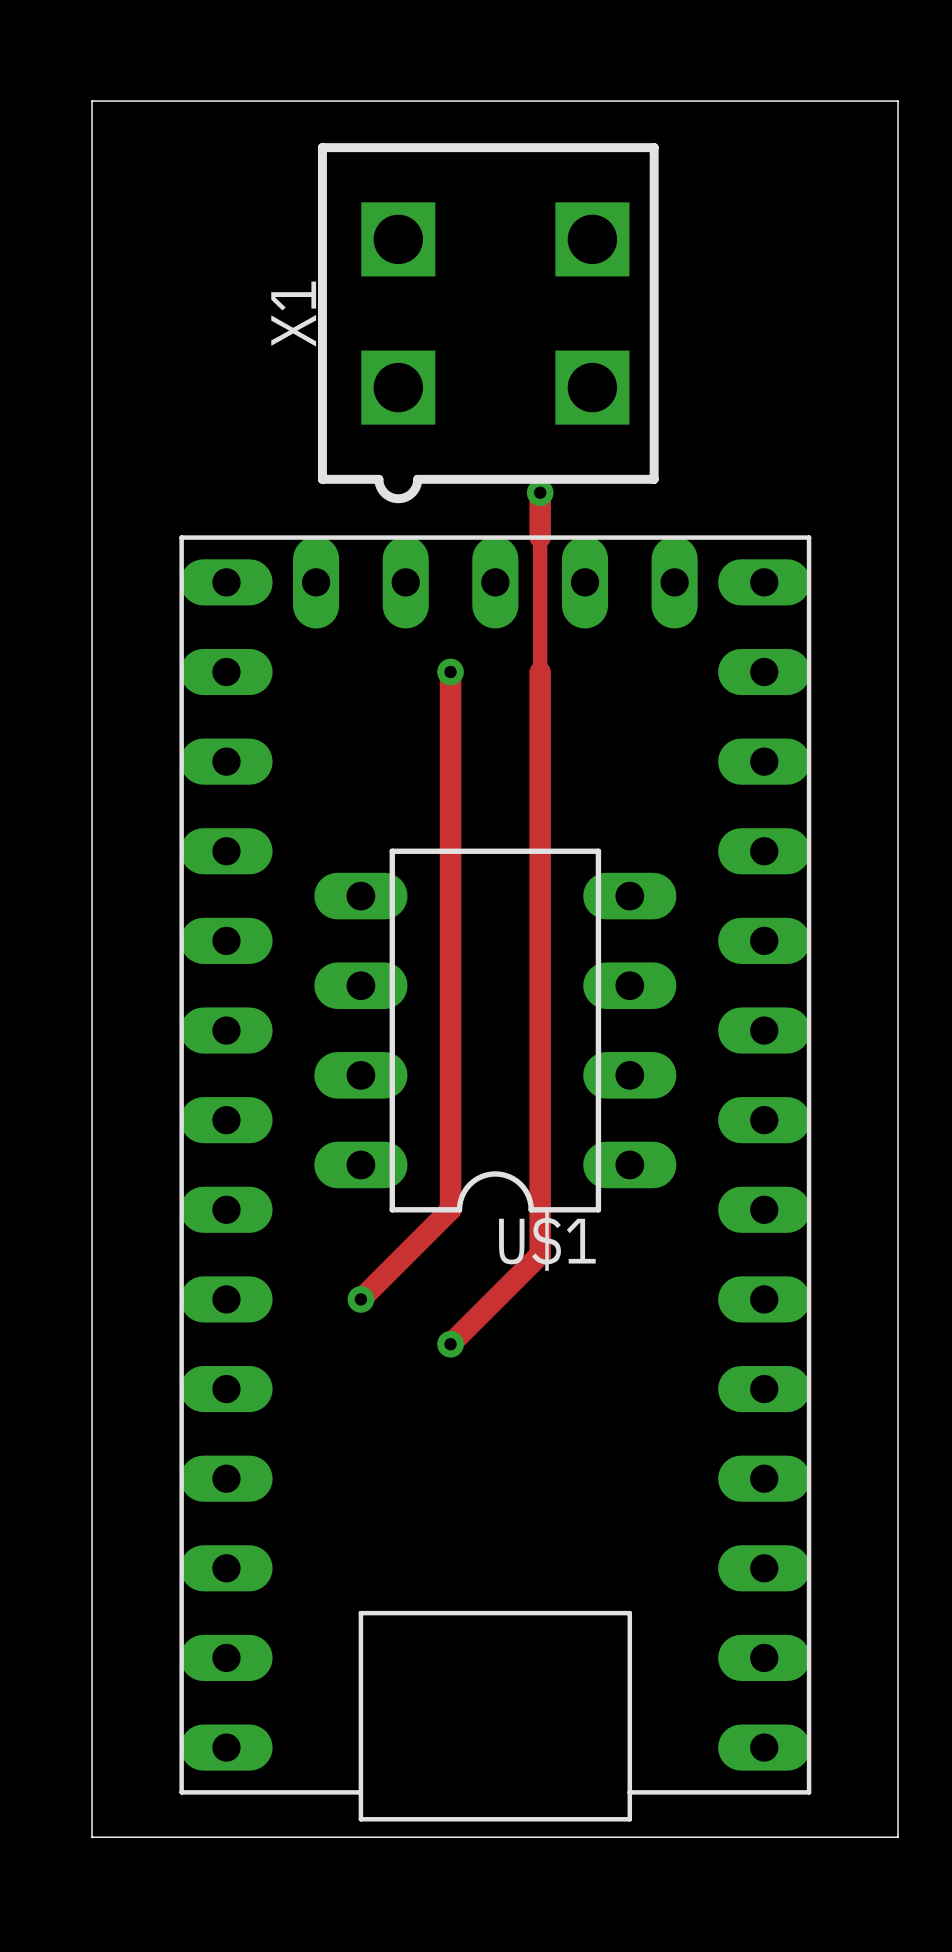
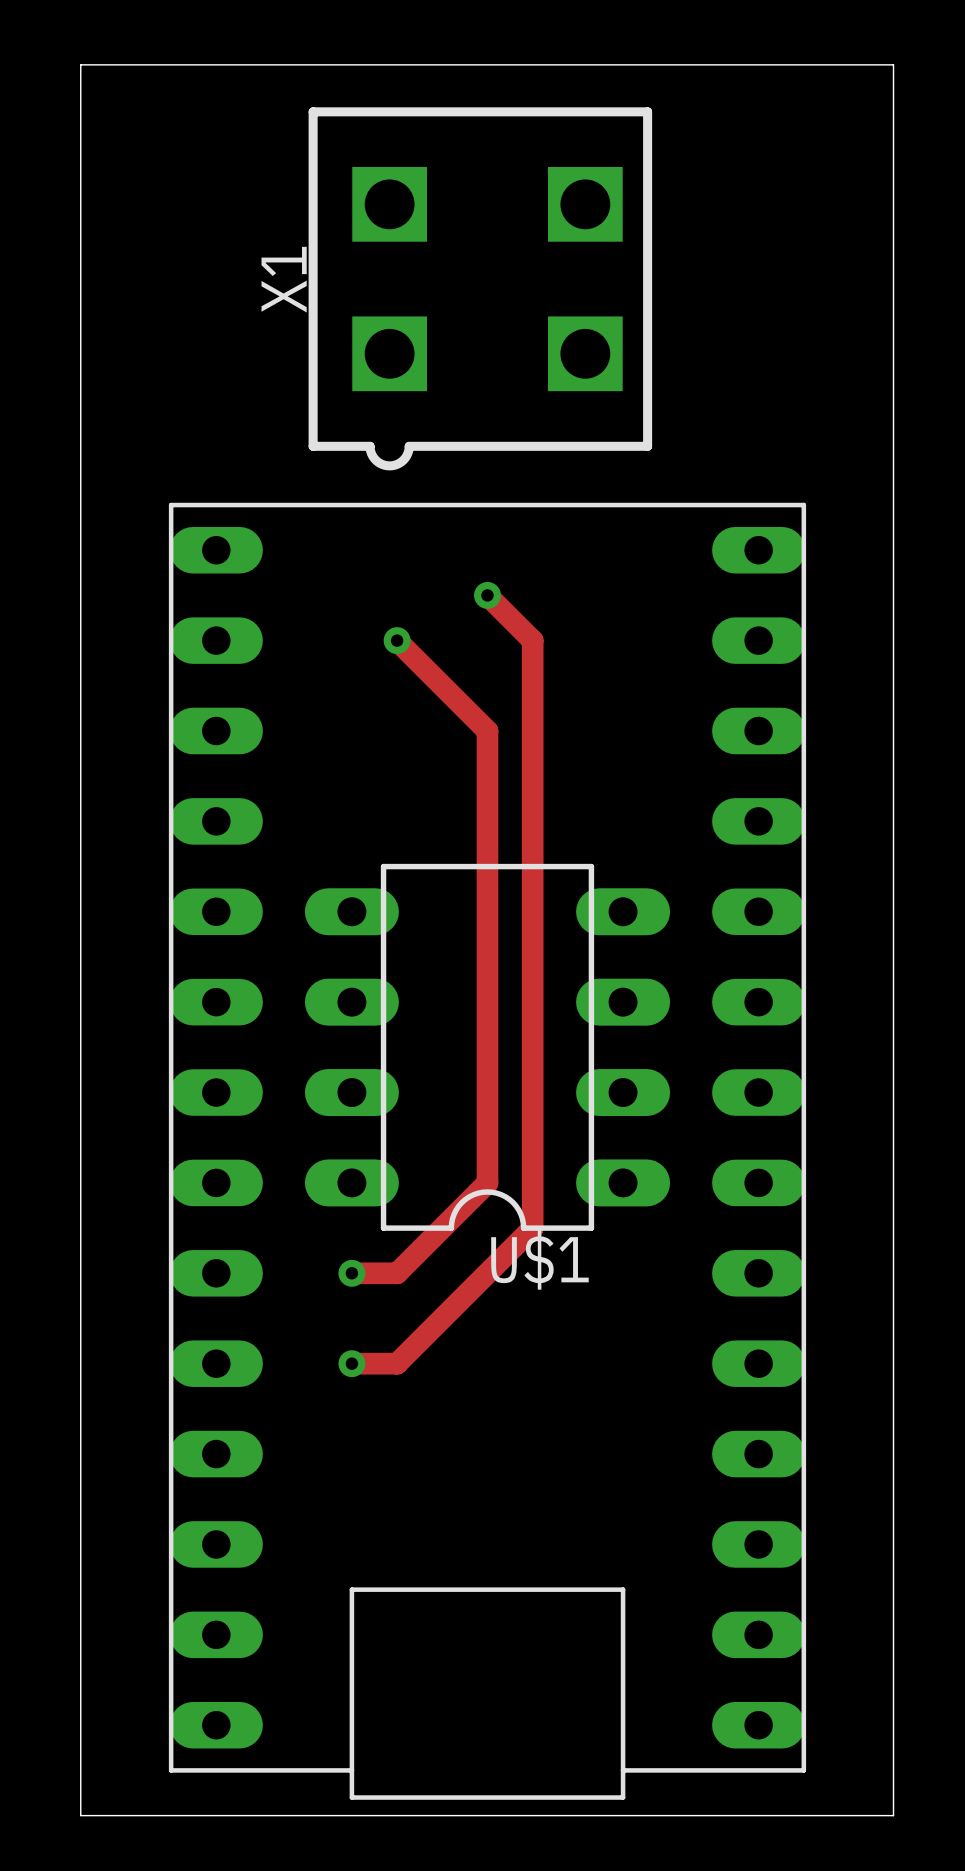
track: (540, 492) (540, 672) -> (487, 595) (532, 640)
via: (540, 492) -> none
part footprint: [179, 535, 812, 1822] -> [168, 502, 807, 1800]
via: none -> (487, 595)
via: none -> (397, 640)
track: (450, 672) (450, 1209) (360, 1299) -> (397, 640) (487, 731) (487, 1182) (397, 1273) (351, 1273)
via: (450, 672) -> none
U$1 position: (495, 1030) -> (487, 1047)
track: none -> (442, 1318) (397, 1363) (351, 1363)
via position: (450, 1344) -> (351, 1363)

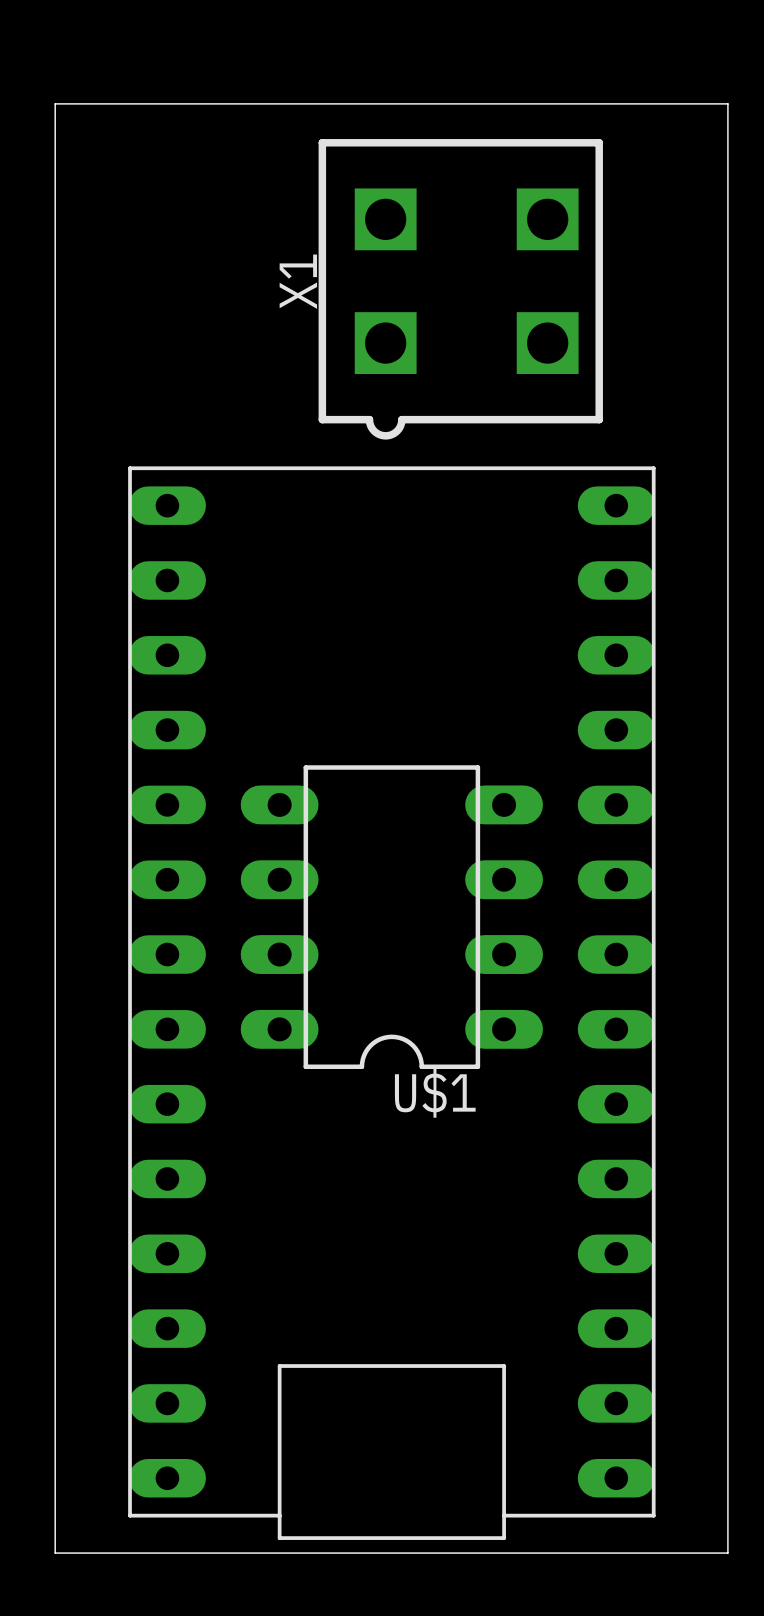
X1 position: (480, 288) -> (460, 289)
track: (487, 595) (532, 640) (532, 1228) (397, 1363) (351, 1363) -> none
via: (487, 595) -> none
track: (397, 640) (487, 731) (487, 1182) (397, 1273) (351, 1273) -> none
via: (397, 640) -> none
via: (351, 1273) -> none
via: (351, 1363) -> none

